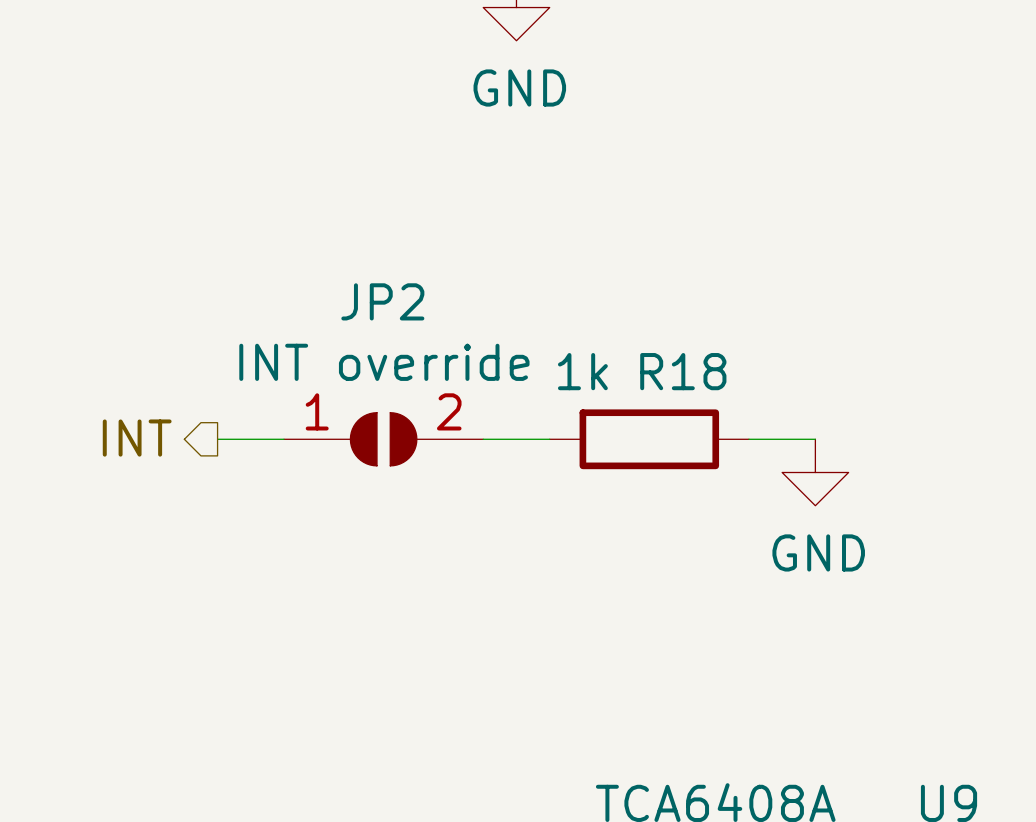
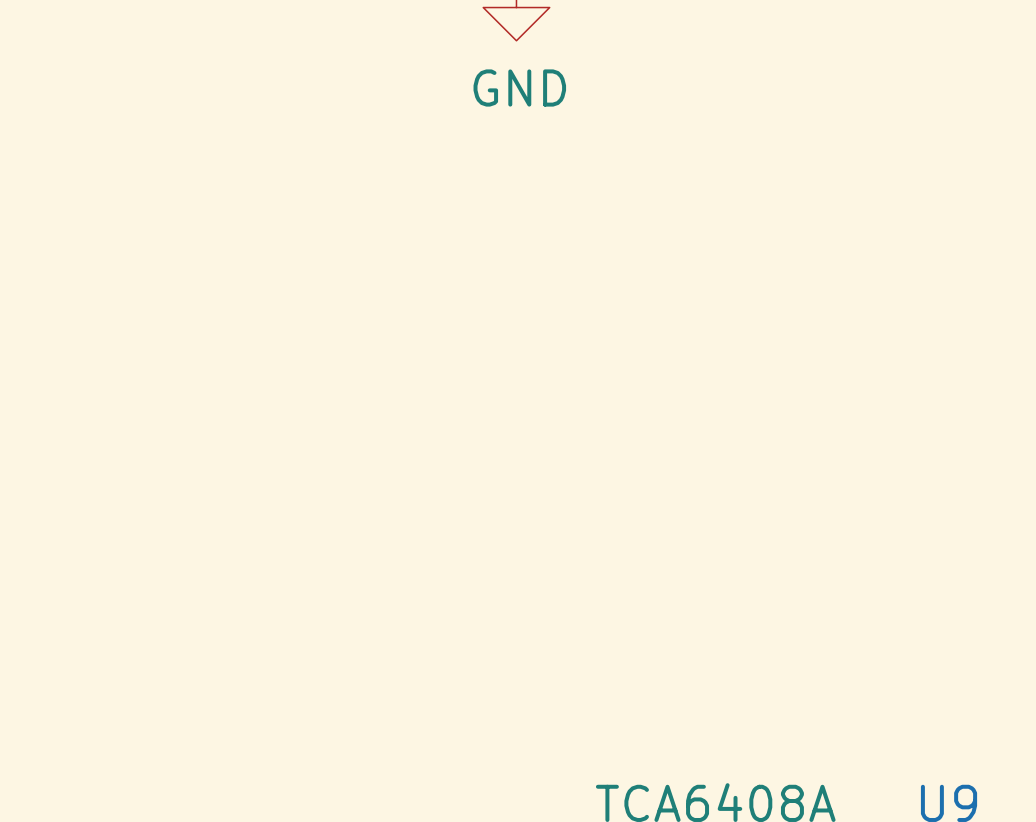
hierarchical label: INT (137, 438) -> none
wire: (217, 439) (283, 439) -> none
JP2: INT override (383, 439) -> none
wire: (483, 439) (549, 439) -> none
R18: 1k (649, 439) -> none
wire: (748, 439) (815, 439) -> none
power symbol: GND (815, 472) -> none

